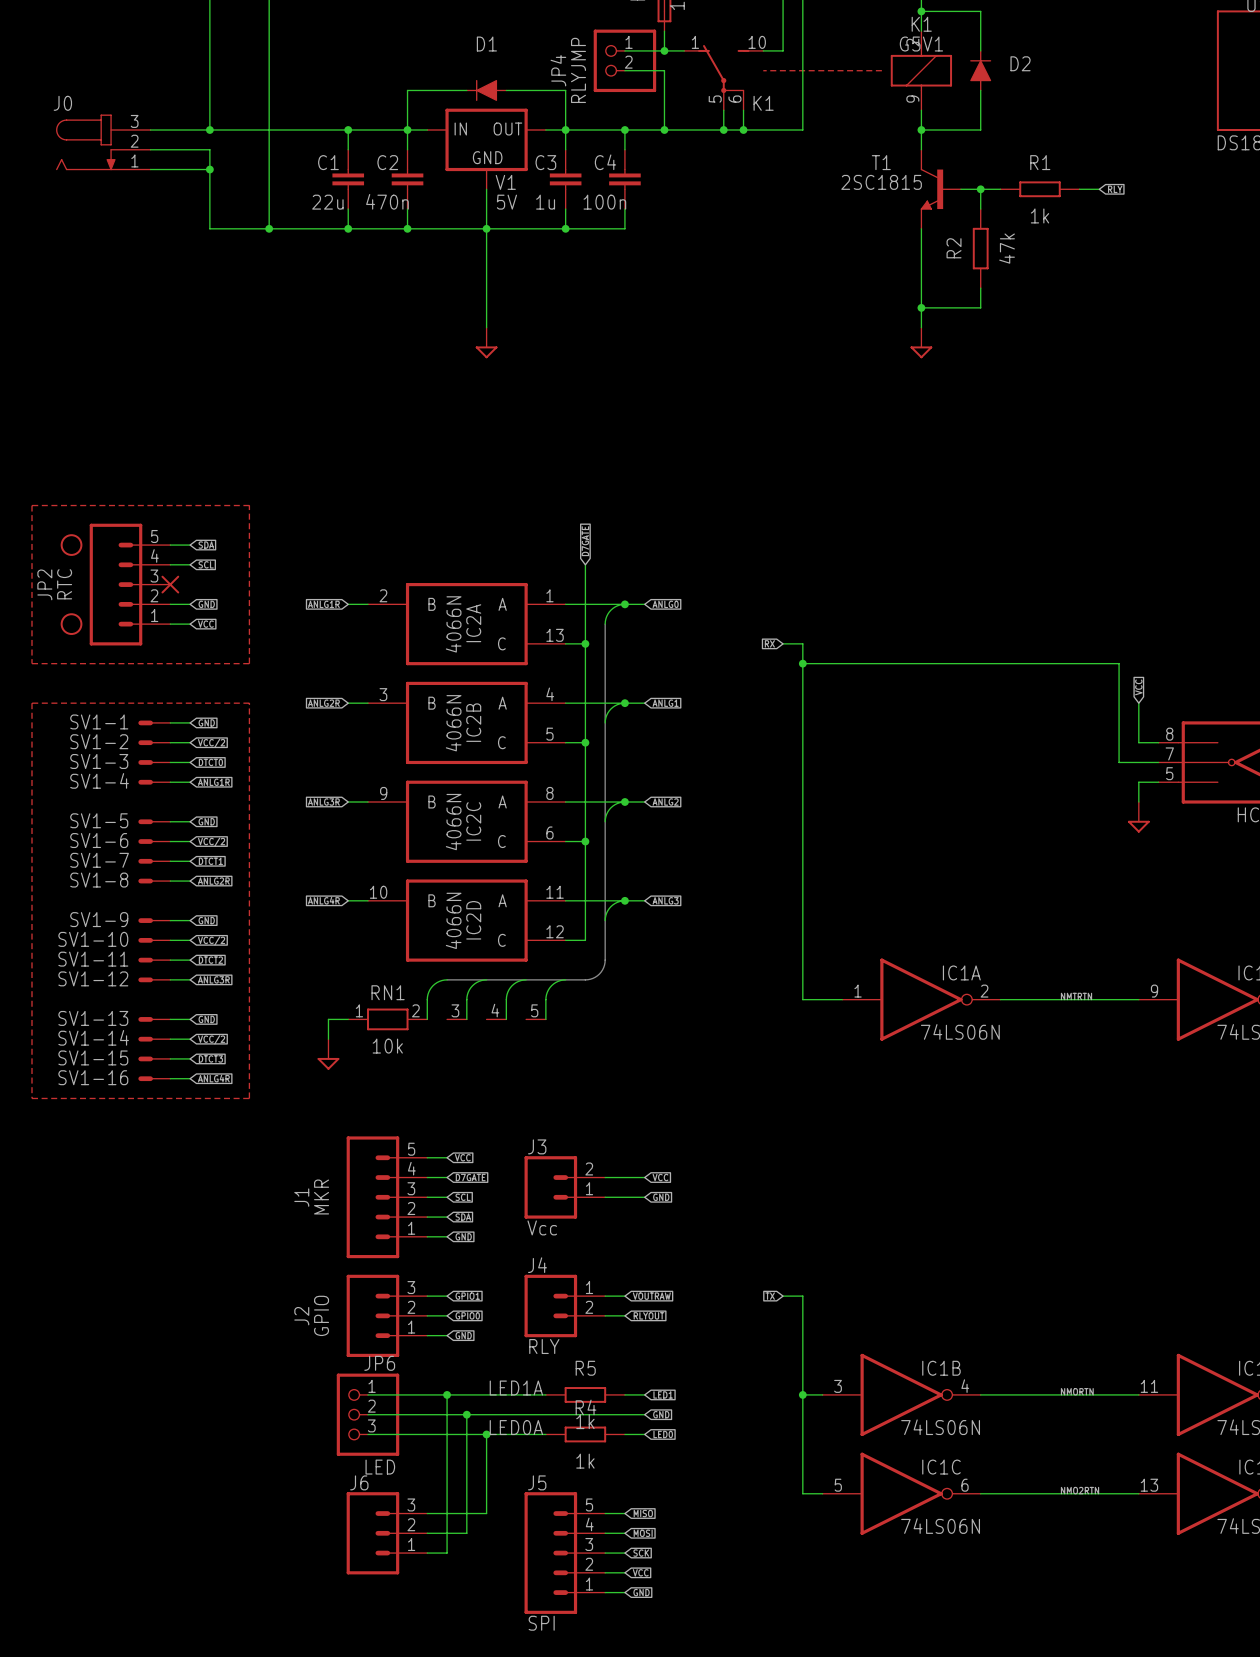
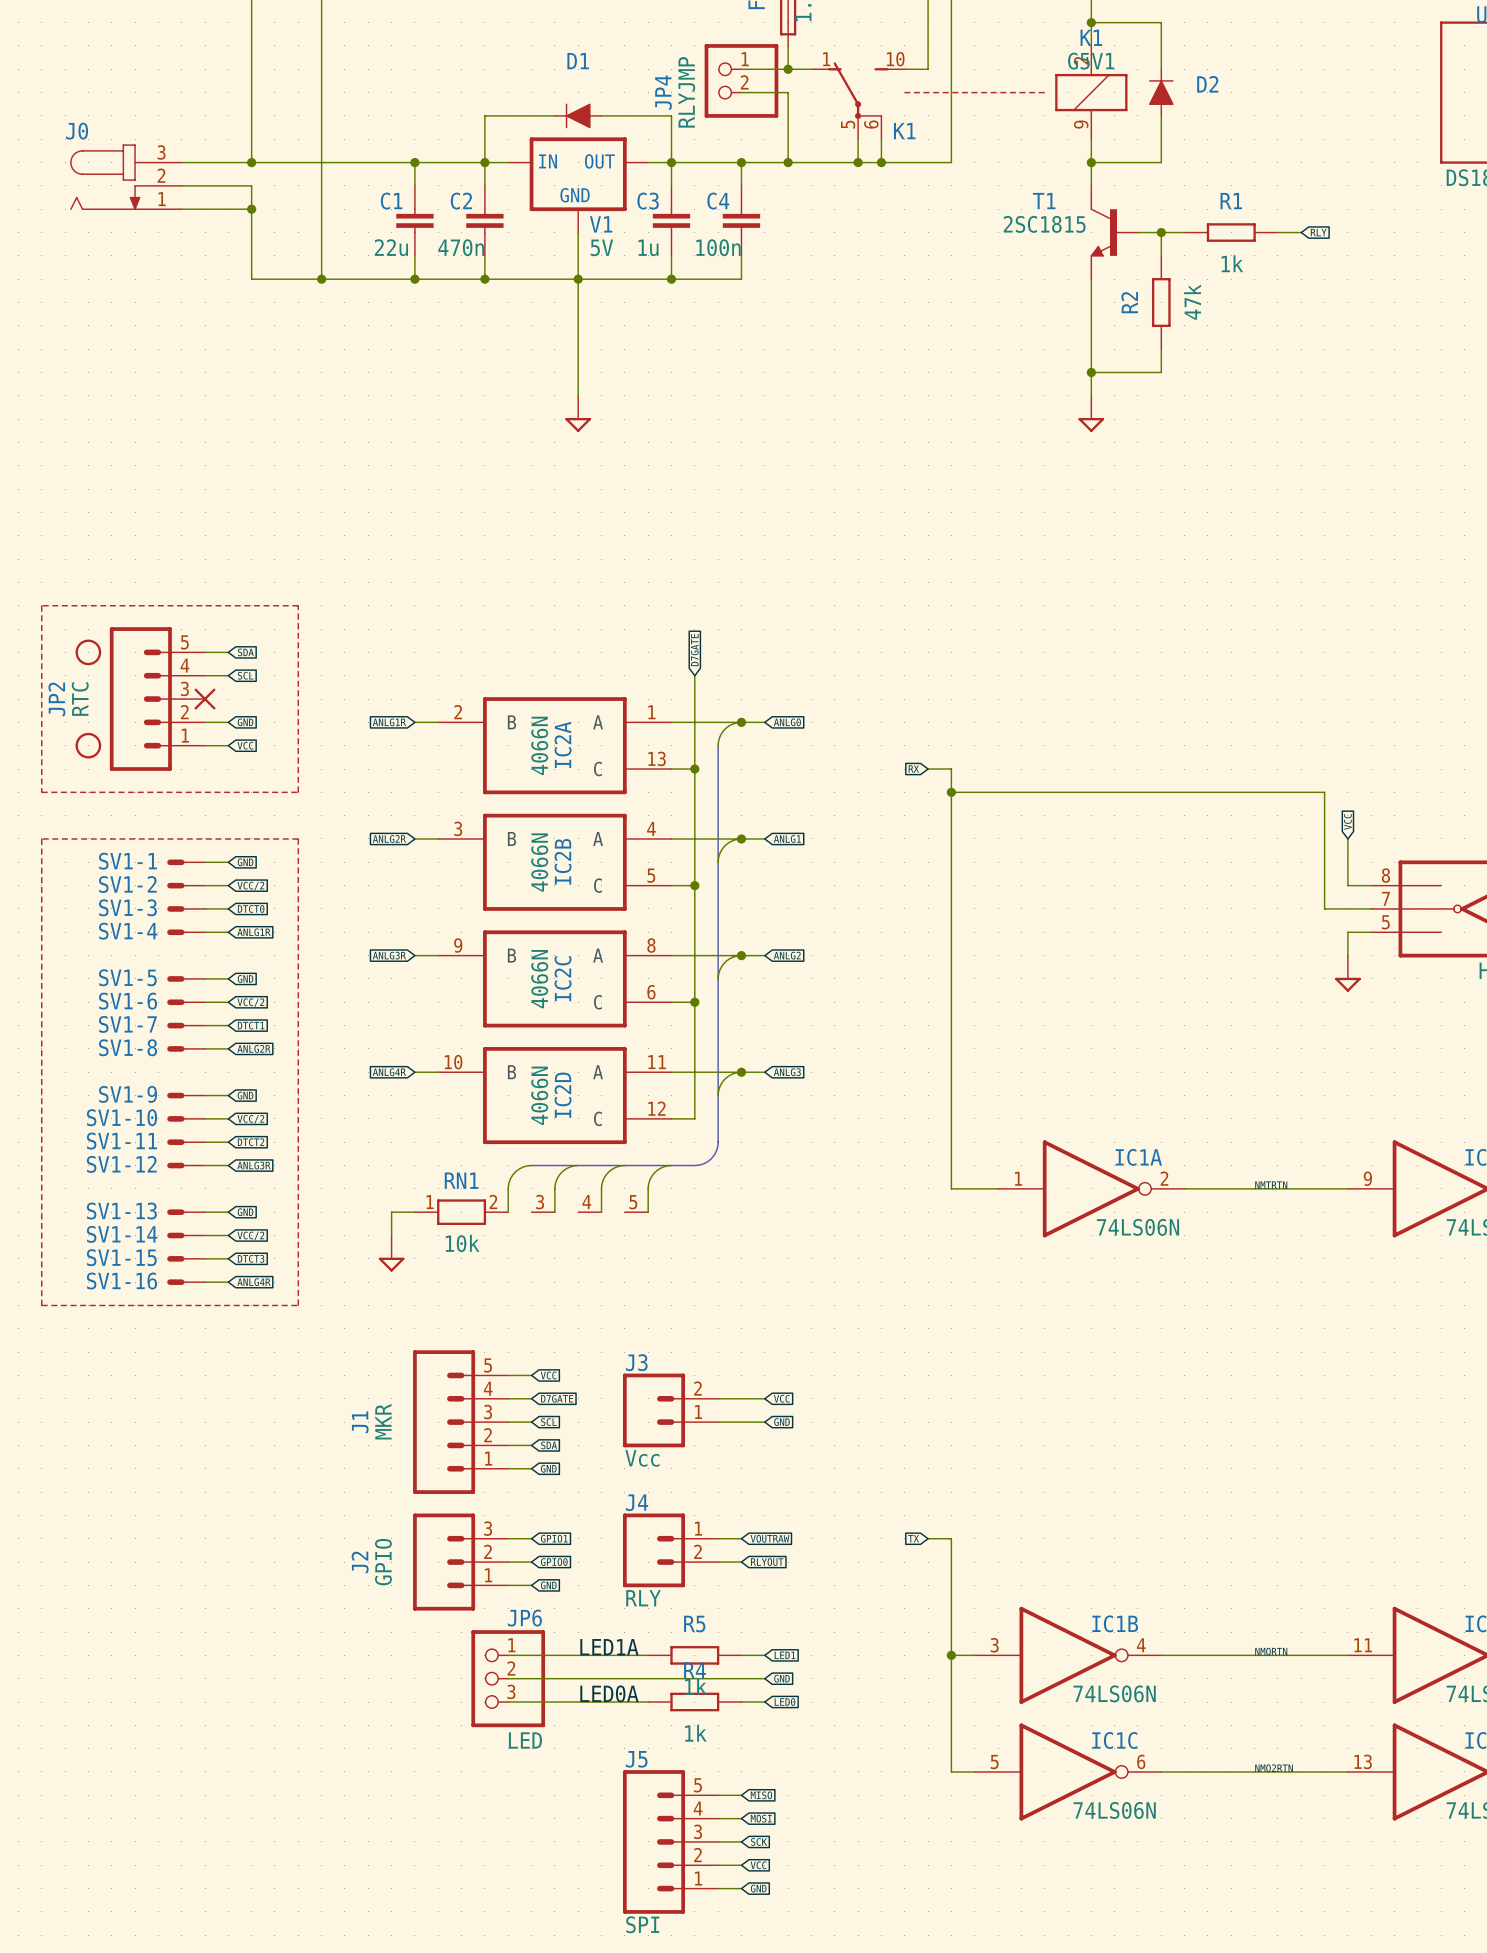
wire: (368, 1394) (427, 1394) -> none
wire: (447, 1394) (447, 1553) (427, 1553) -> none
junction: (447, 1394) -> none
wire: (368, 1414) (427, 1414) -> none
JP6 position: (368, 1414) -> (508, 1678)
wire: (466, 1414) (466, 1533) (427, 1533) -> none
junction: (466, 1414) -> none
wire: (368, 1434) (427, 1434) -> none
wire: (486, 1434) (486, 1513) (427, 1513) -> none
junction: (486, 1434) -> none
J6: (386, 1533) -> none

